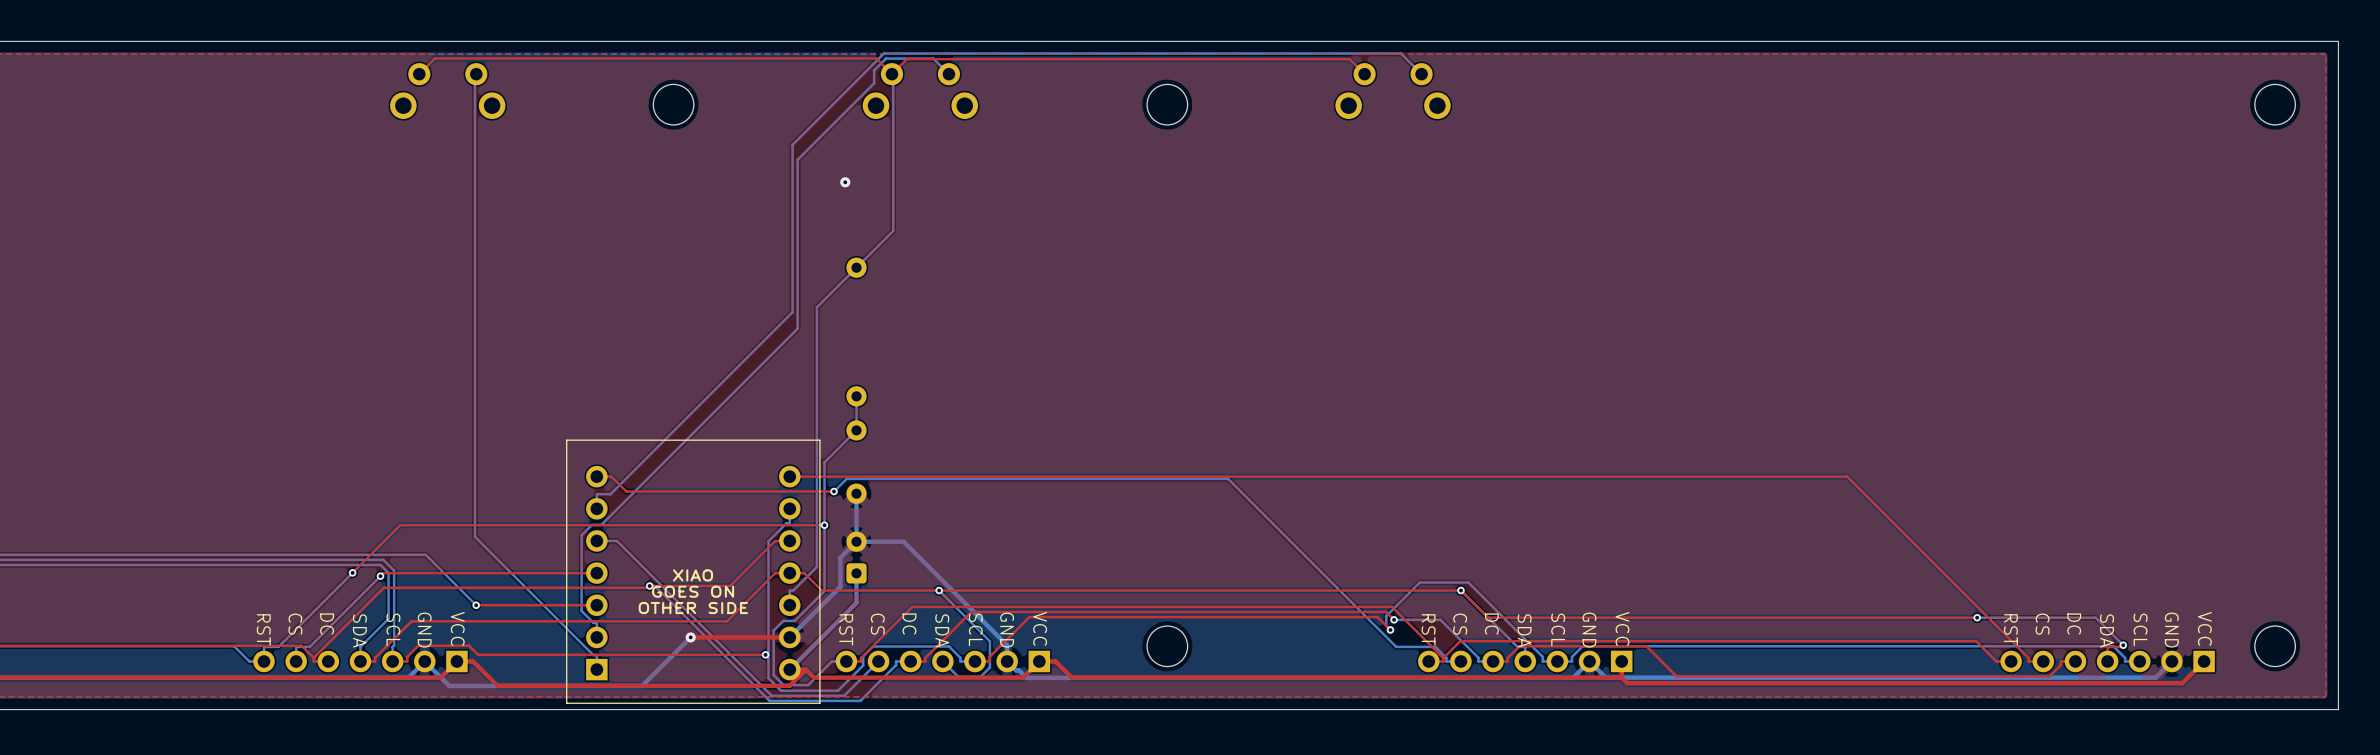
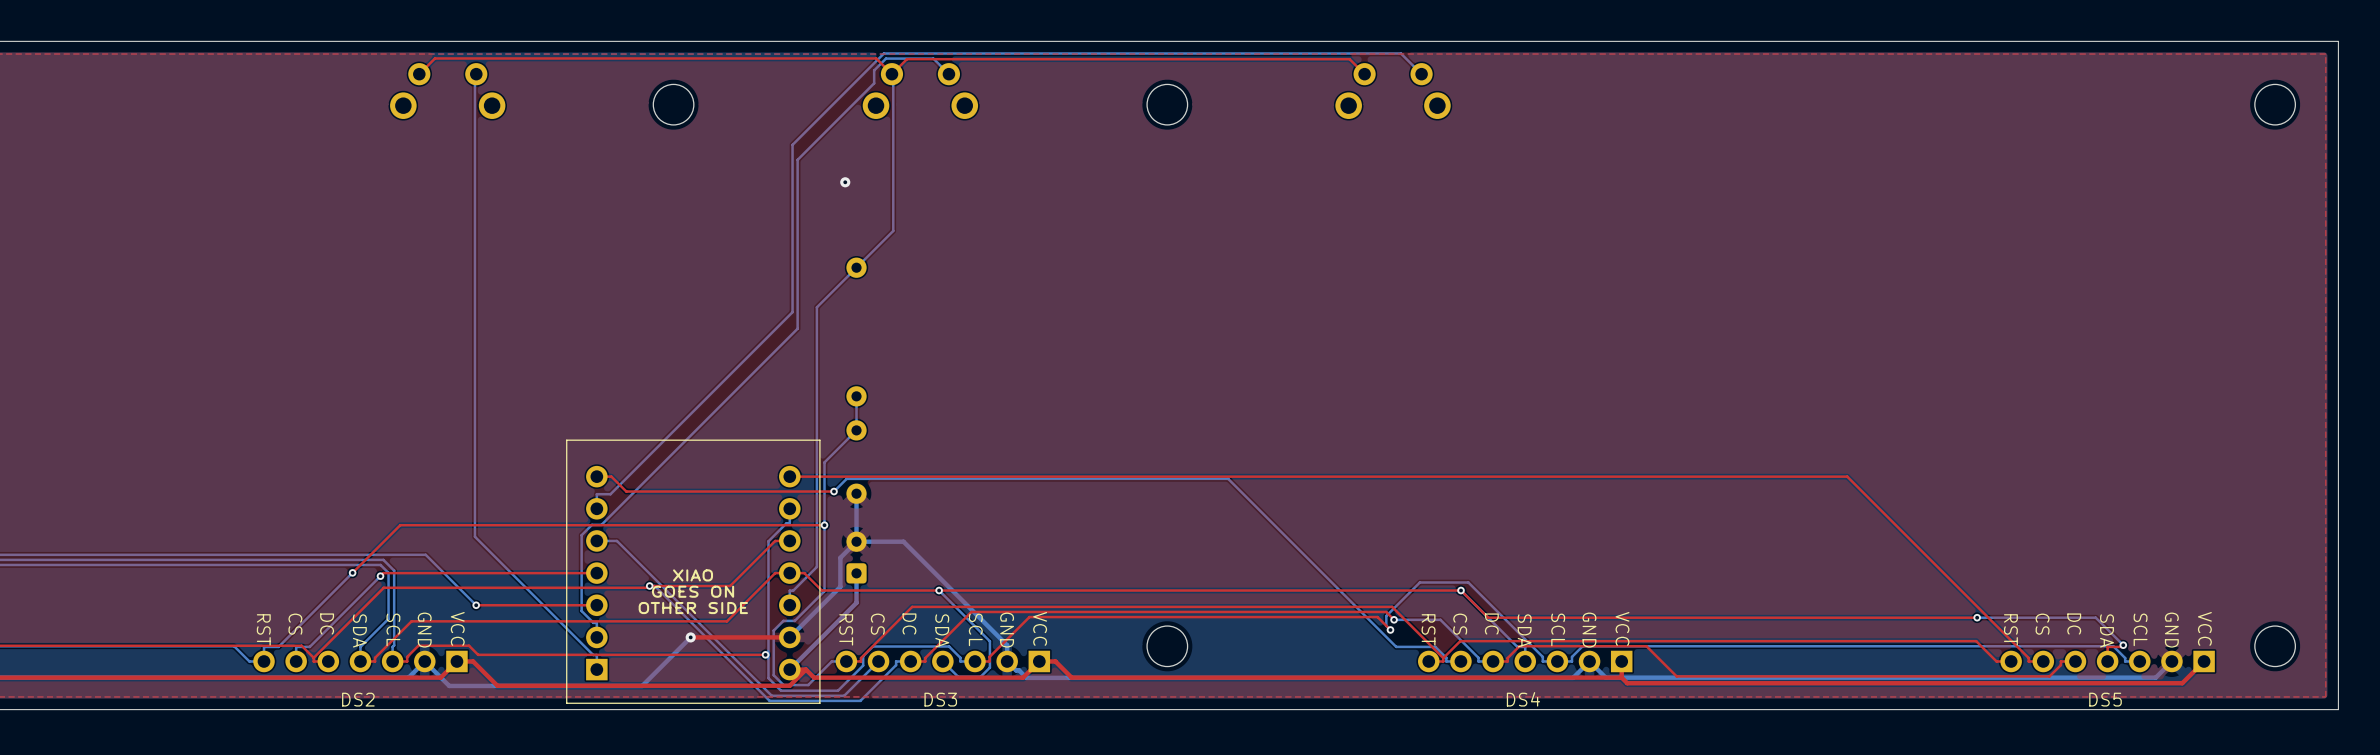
DS2 name: none -> DS2 (358, 699)
DS3 name: none -> DS3 (940, 699)
DS4 name: none -> DS4 (1523, 699)
DS5 name: none -> DS5 (2105, 699)

